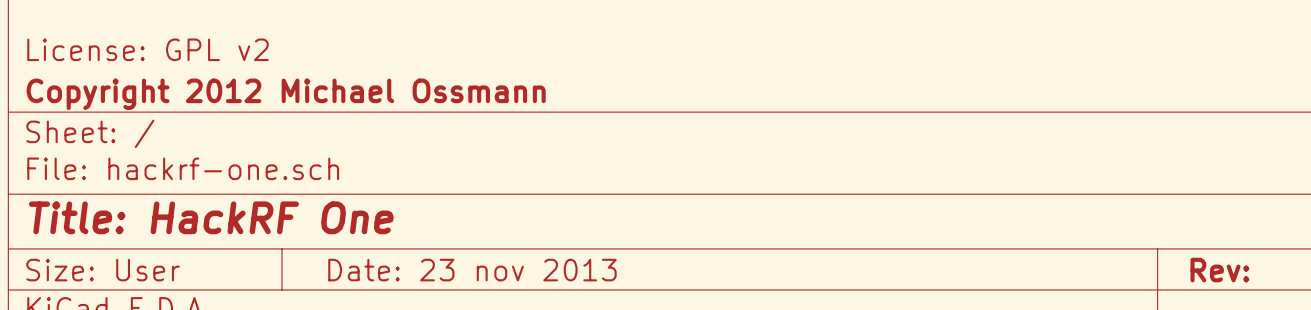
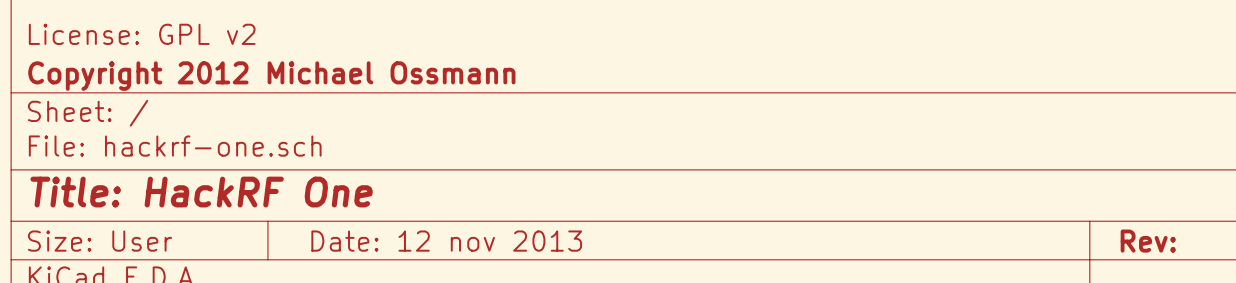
title block: Date: 23 nov 2013 (472, 270) -> Date: 12 nov 2013 (446, 241)

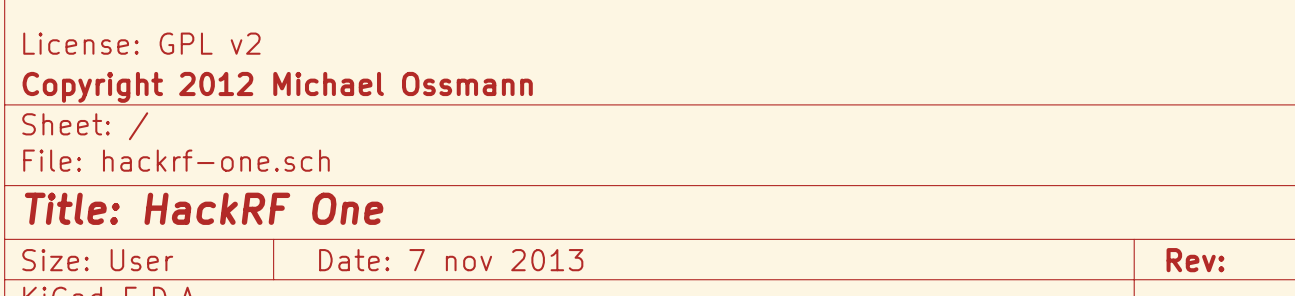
title block: Date: 12 nov 2013 (446, 241) -> Date: 7 nov 2013 (451, 260)

